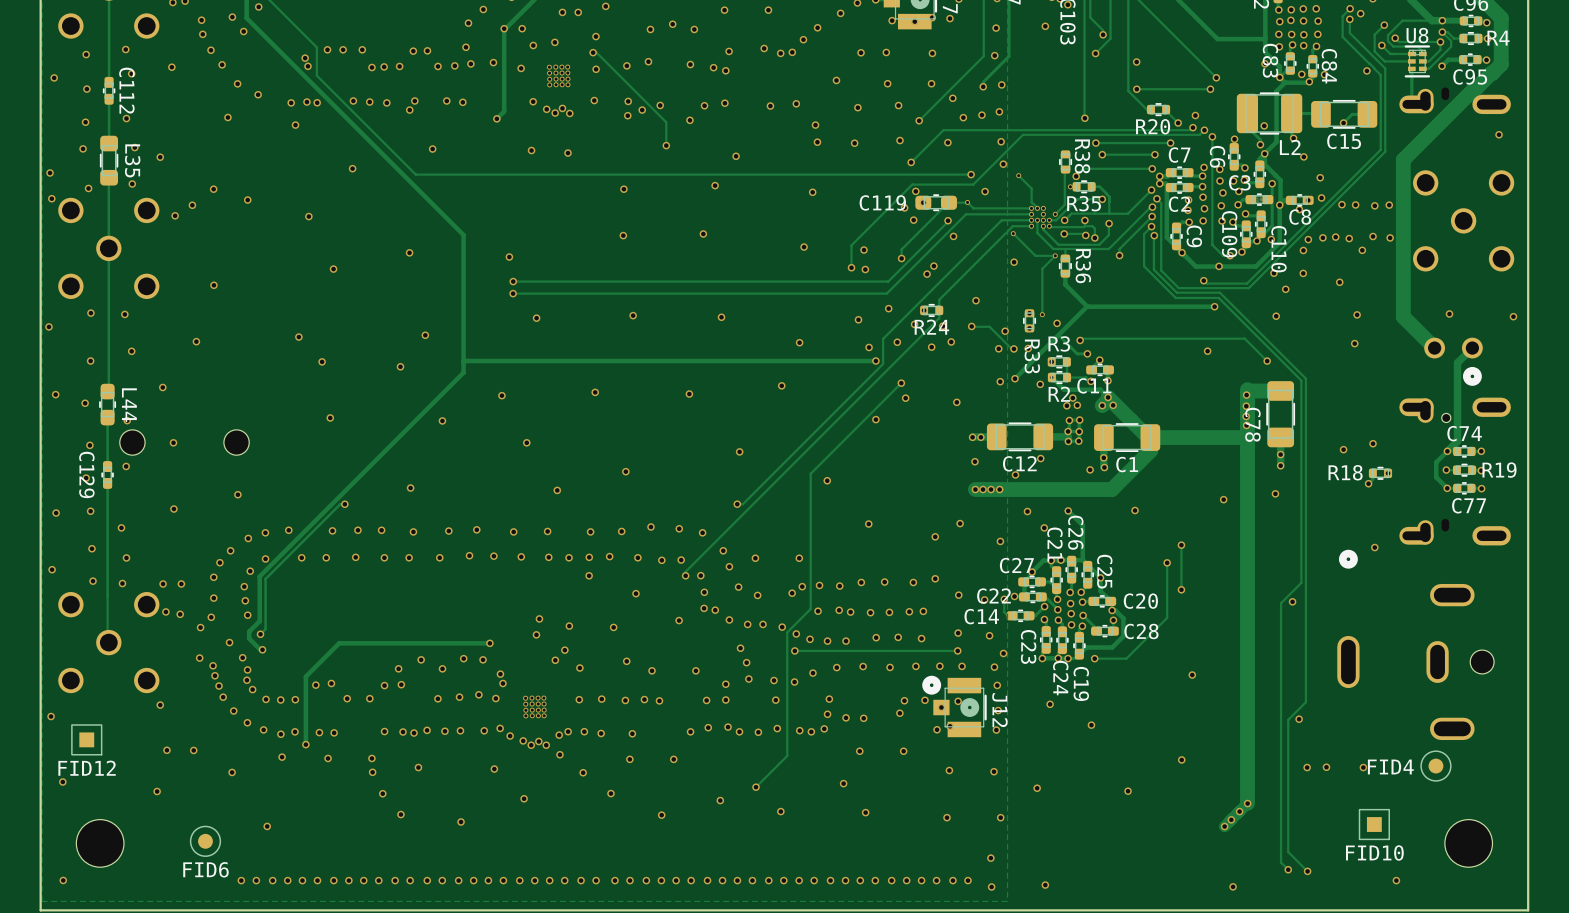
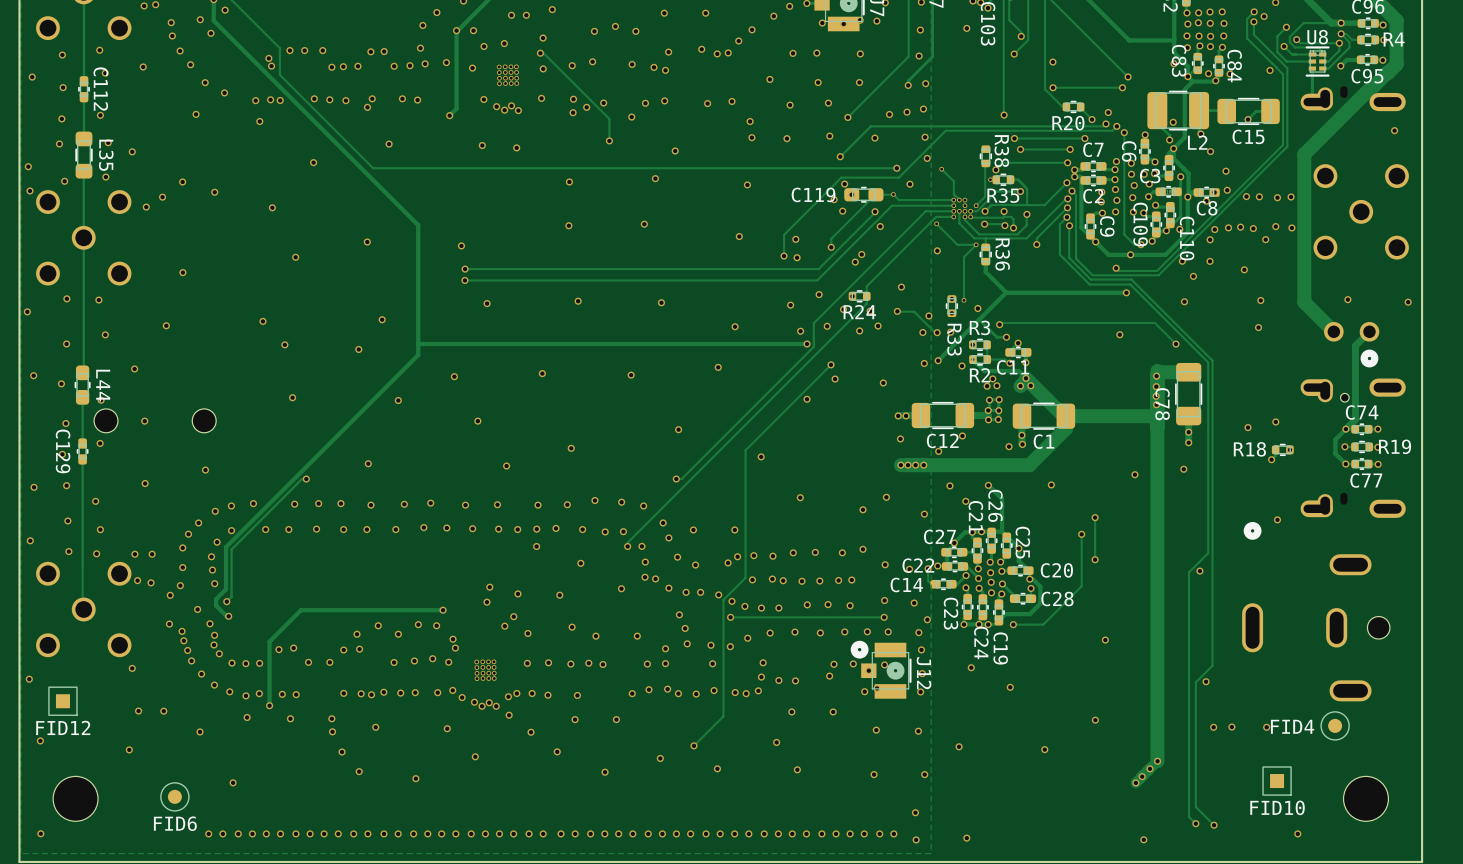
via: (952, 98) -> none

